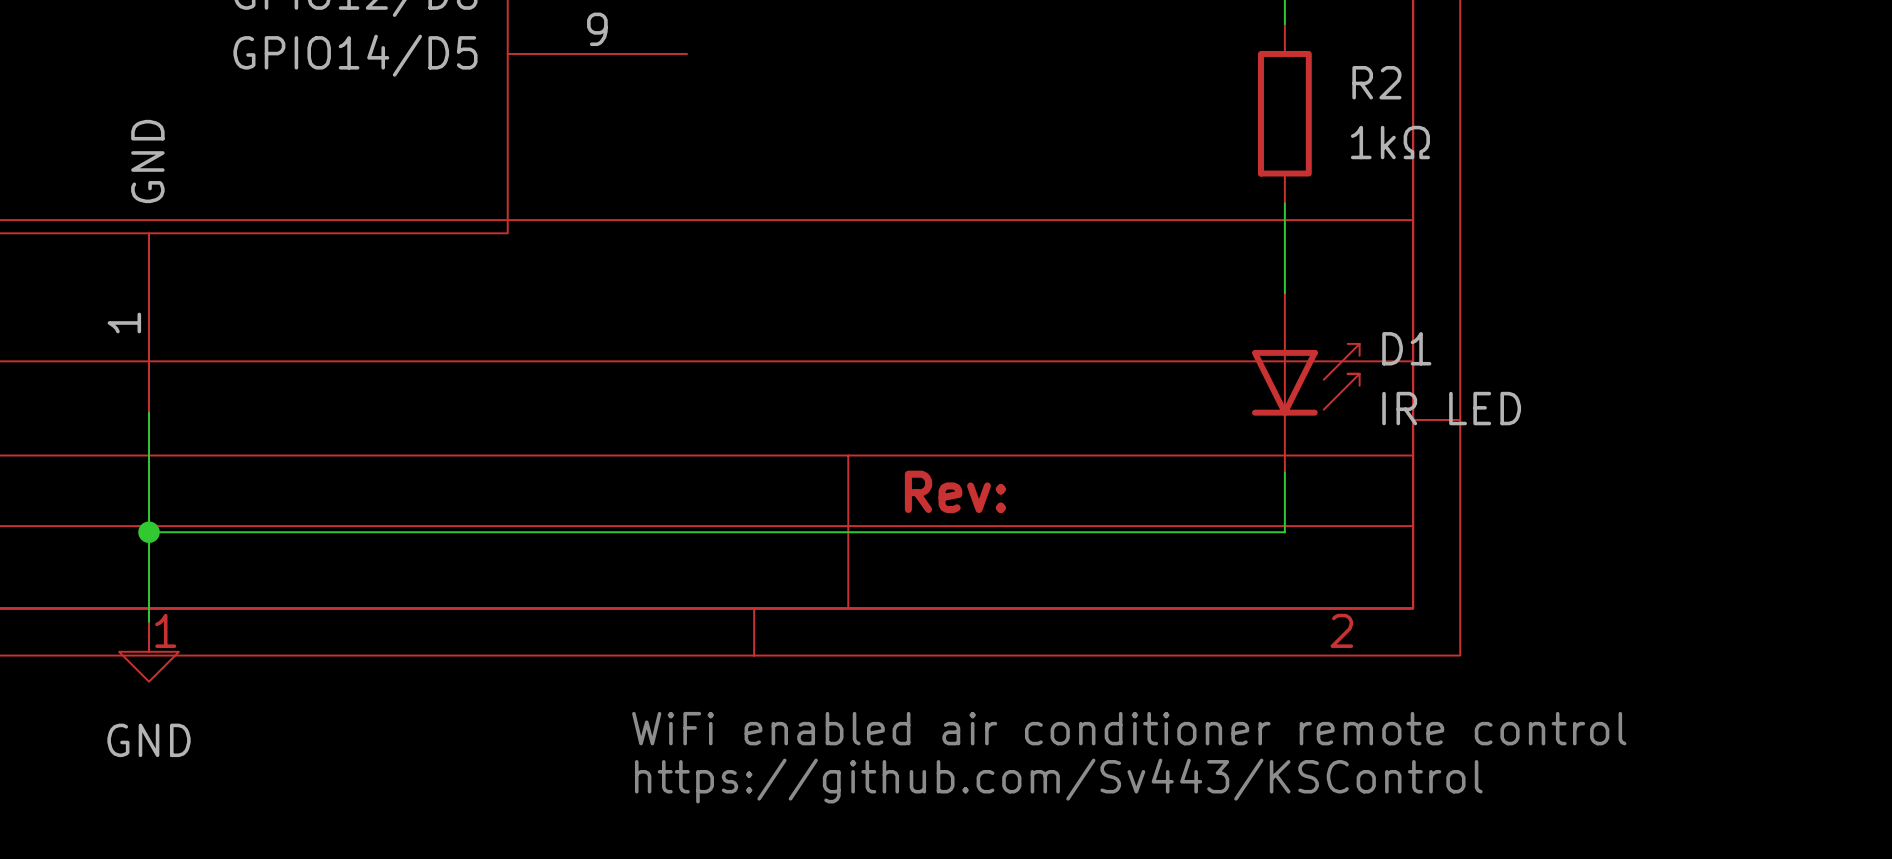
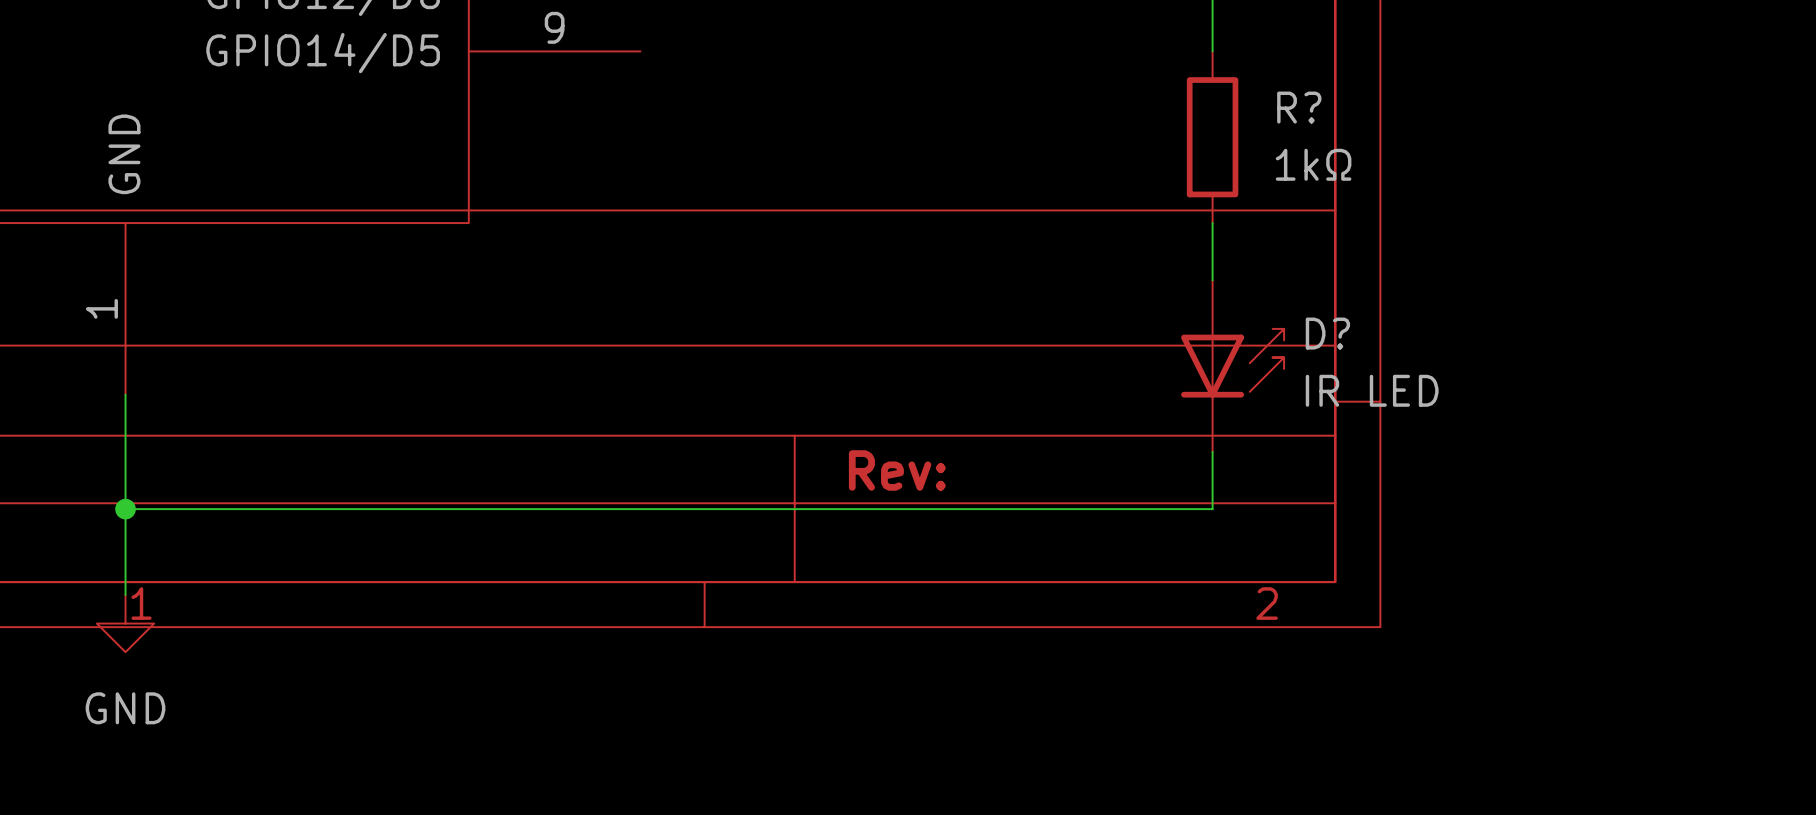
R2: 1kΩ (1284, 113) -> none
R?: none -> 1kΩ (1212, 137)
D1 name: D1 (1406, 348) -> D? (1327, 333)
text: WiFi enabled air conditioner remote control (1129, 728) -> none
text: https://github.com/Sv443/KSControl (1058, 781) -> none

